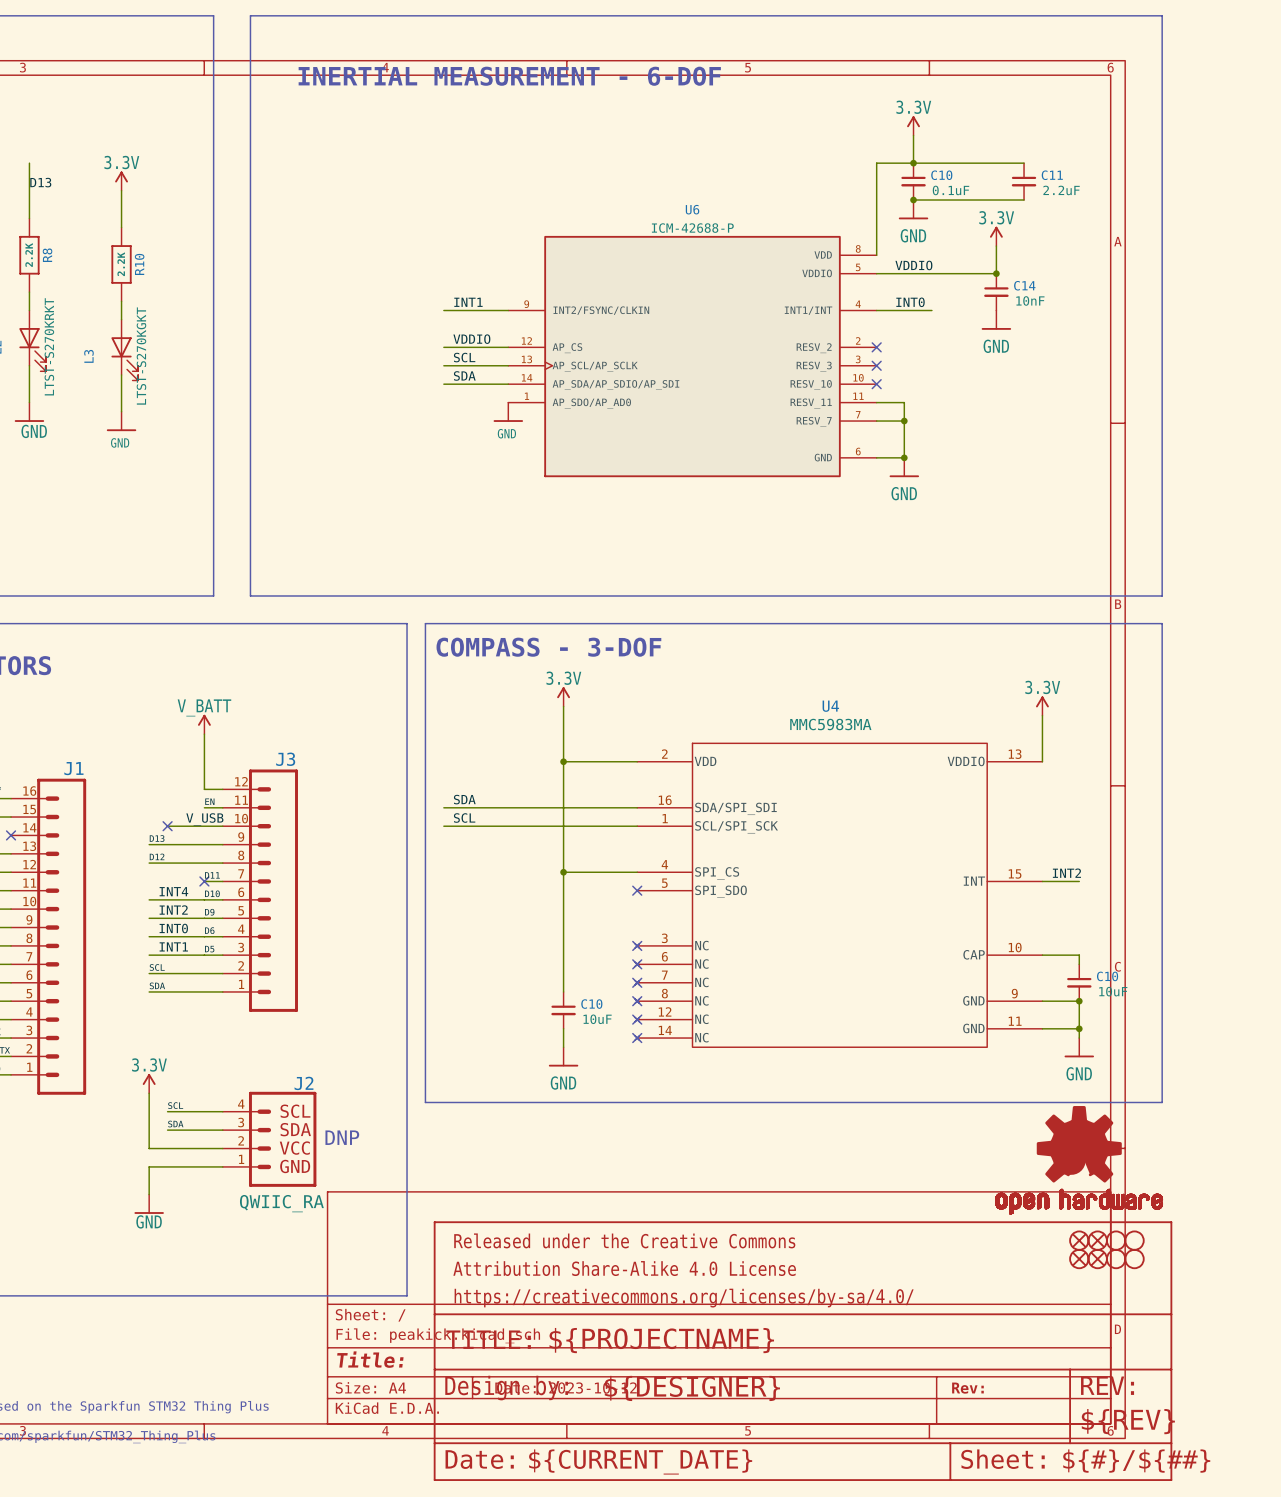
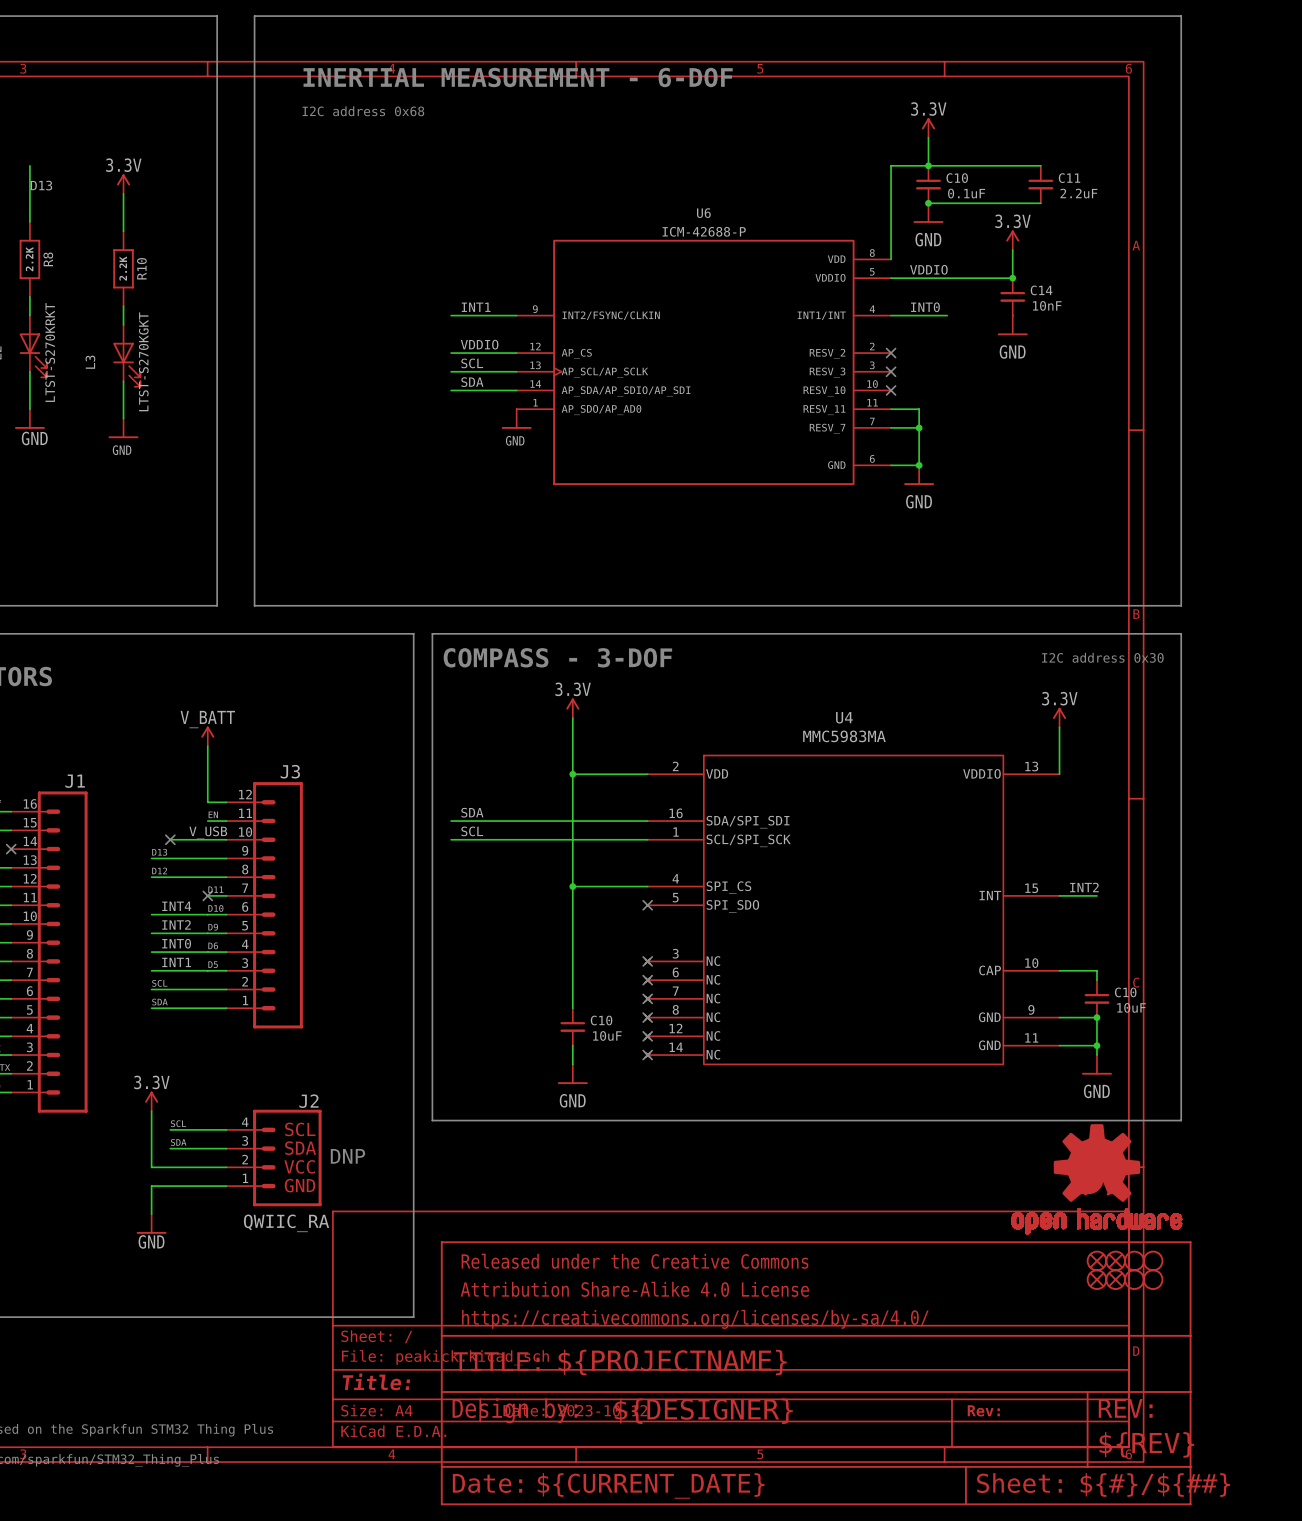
text: none -> I2C address 0x68 (363, 111)
text: none -> I2C address 0x30 (1102, 657)

